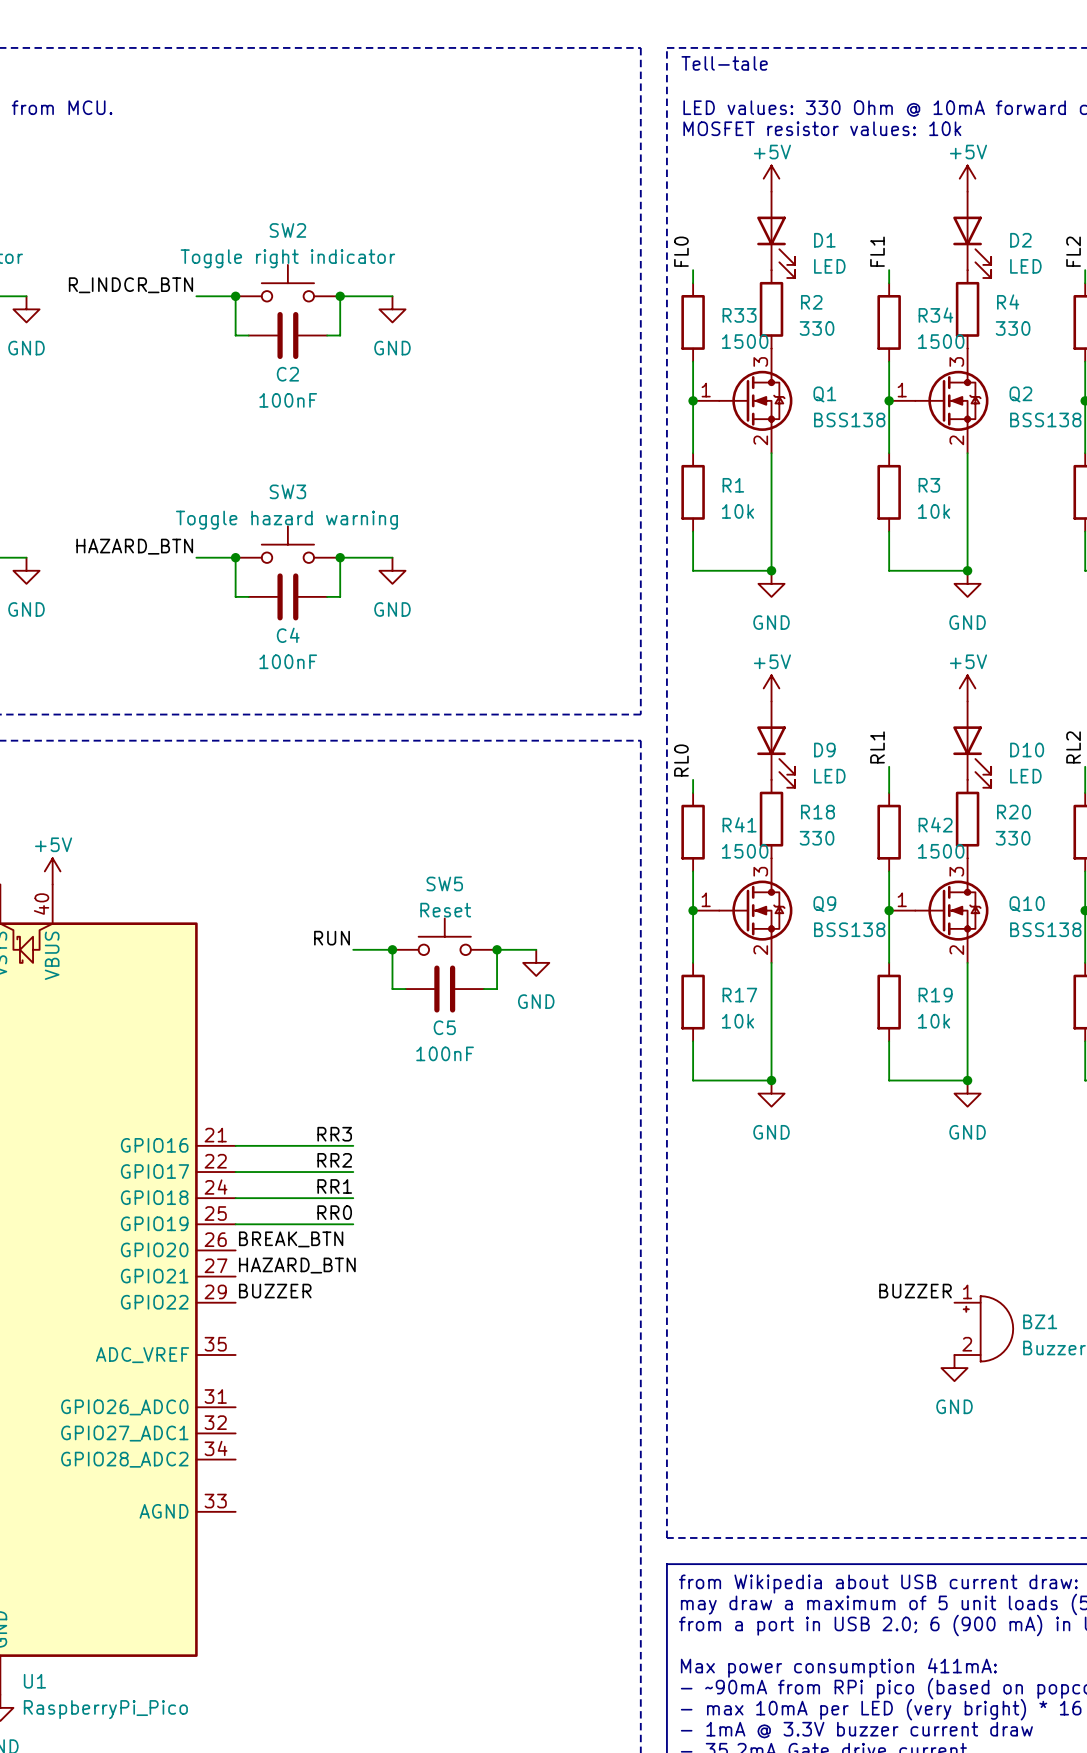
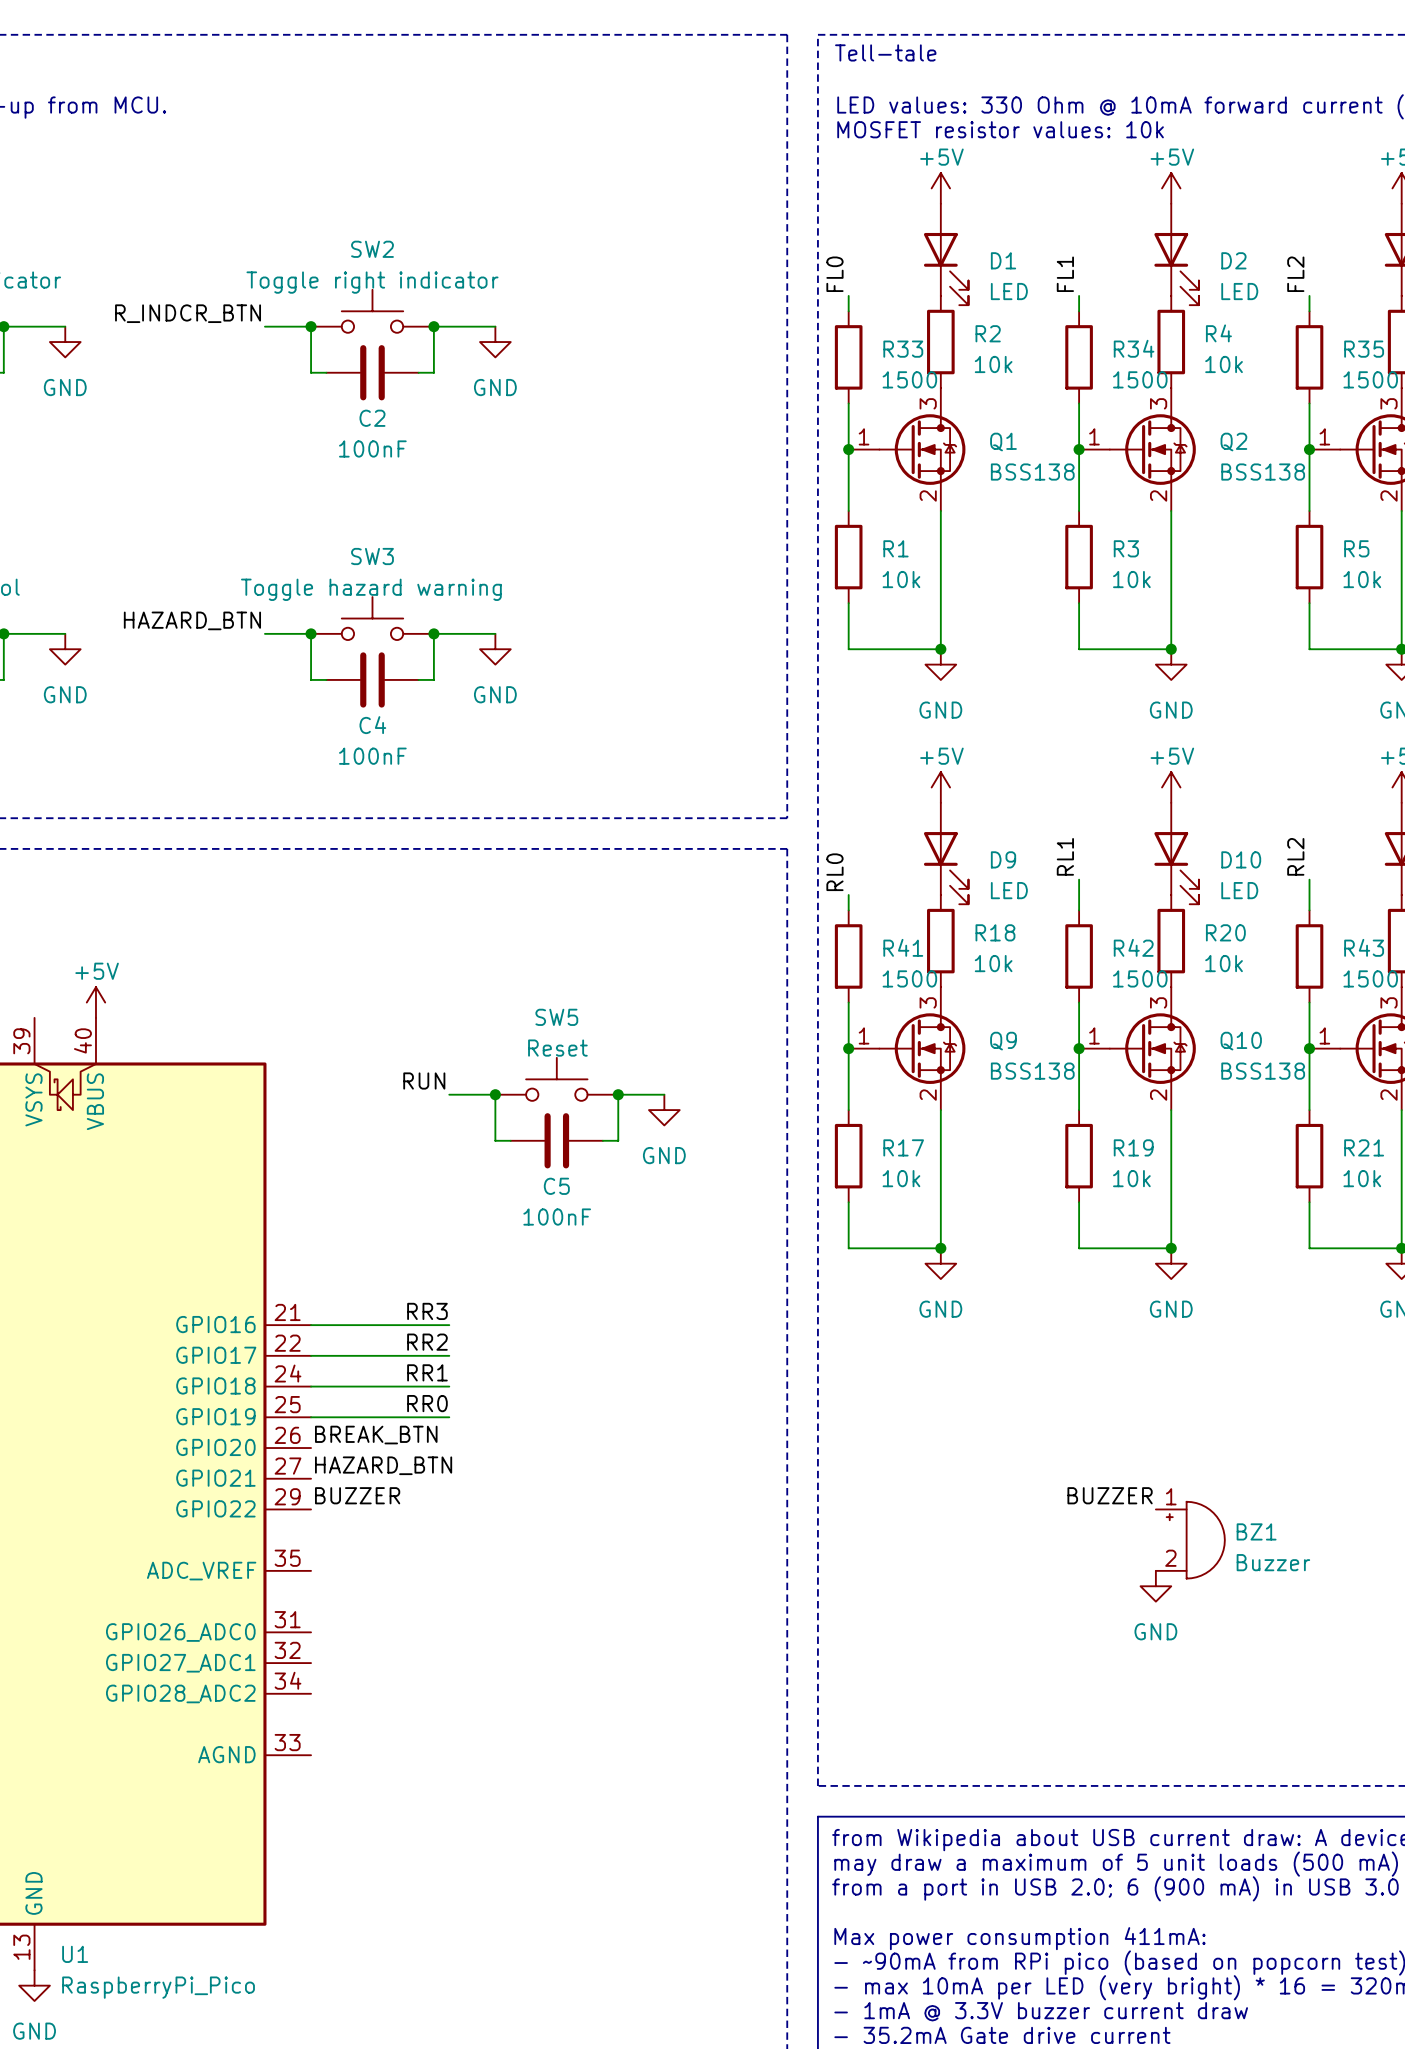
R2 value: 330 (817, 328) -> 10k (993, 364)
R4 value: 330 (1013, 328) -> 10k (1224, 364)
R18 value: 330 (817, 838) -> 10k (993, 963)
R20 value: 330 (1013, 838) -> 10k (1224, 963)

